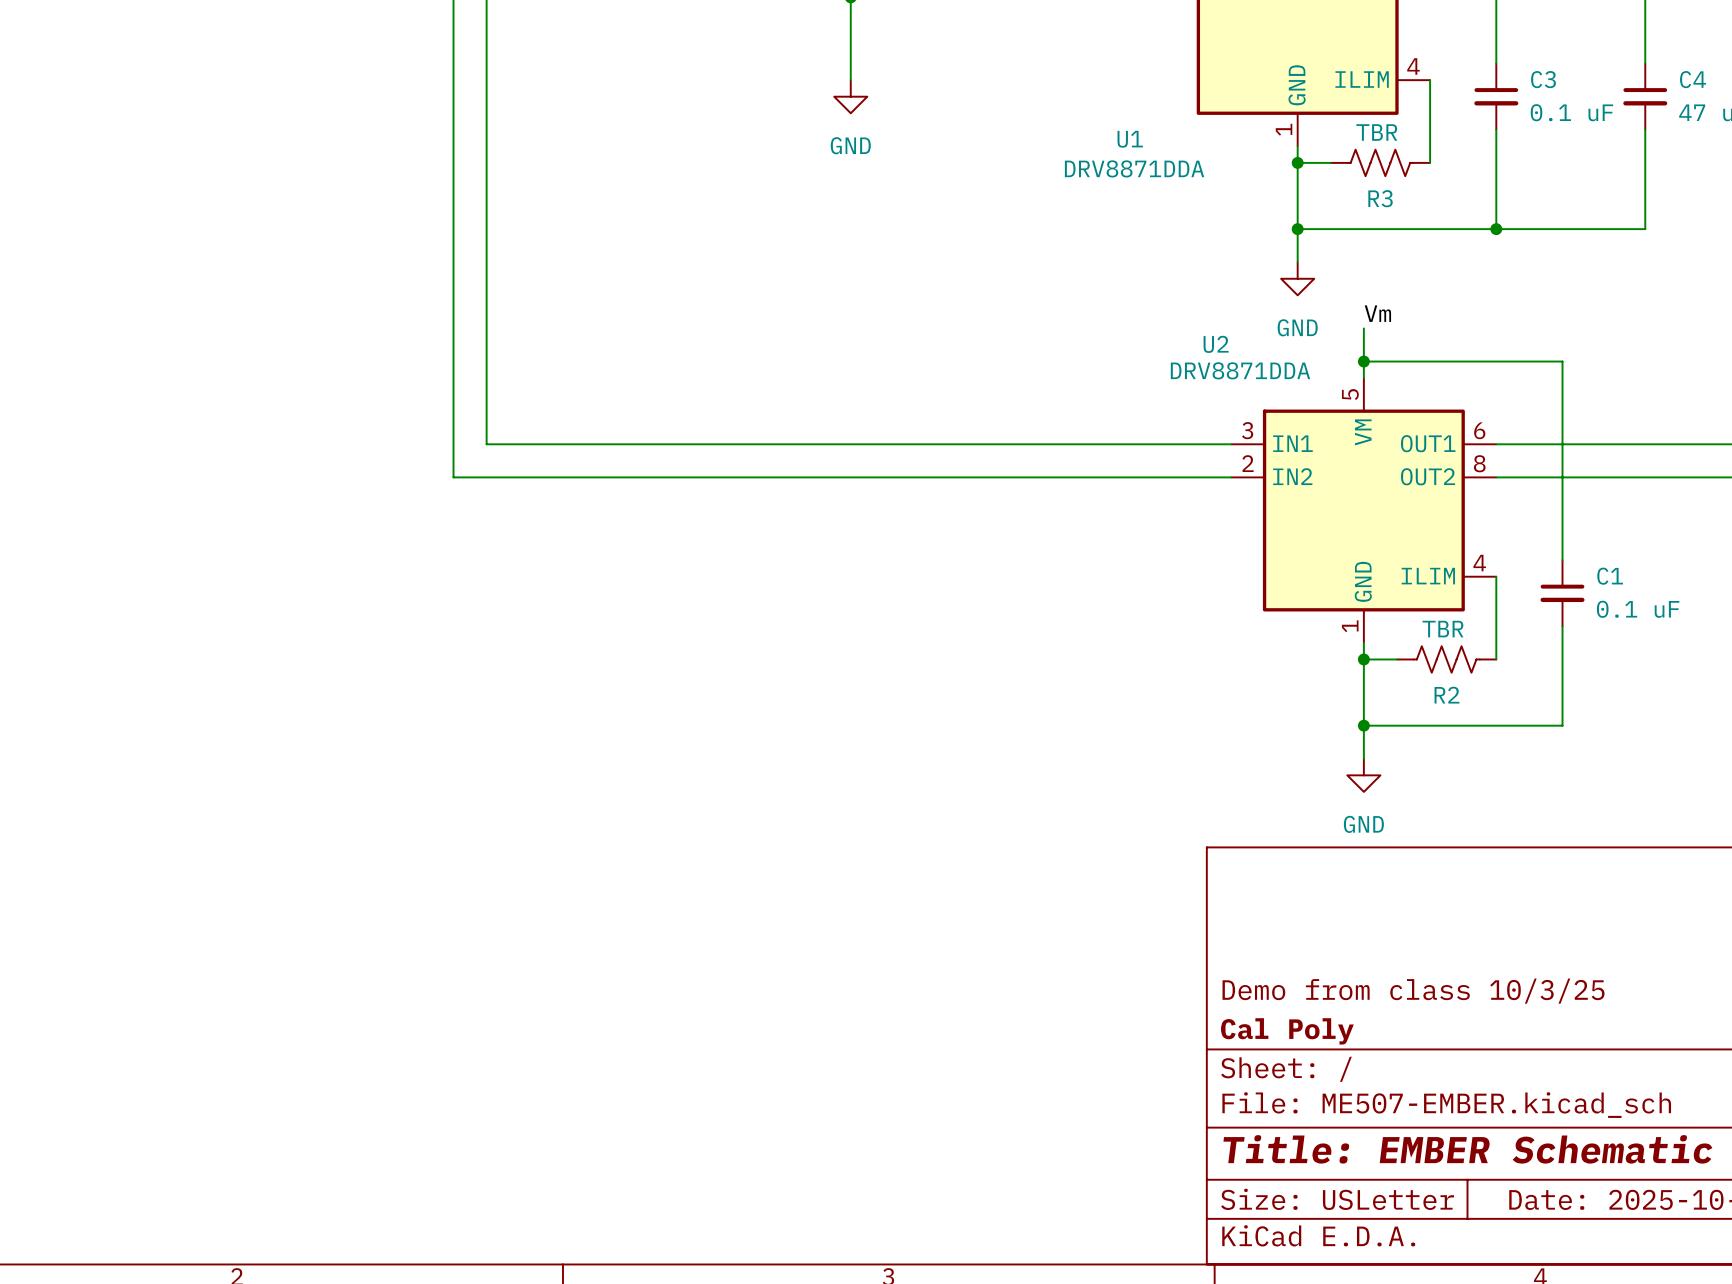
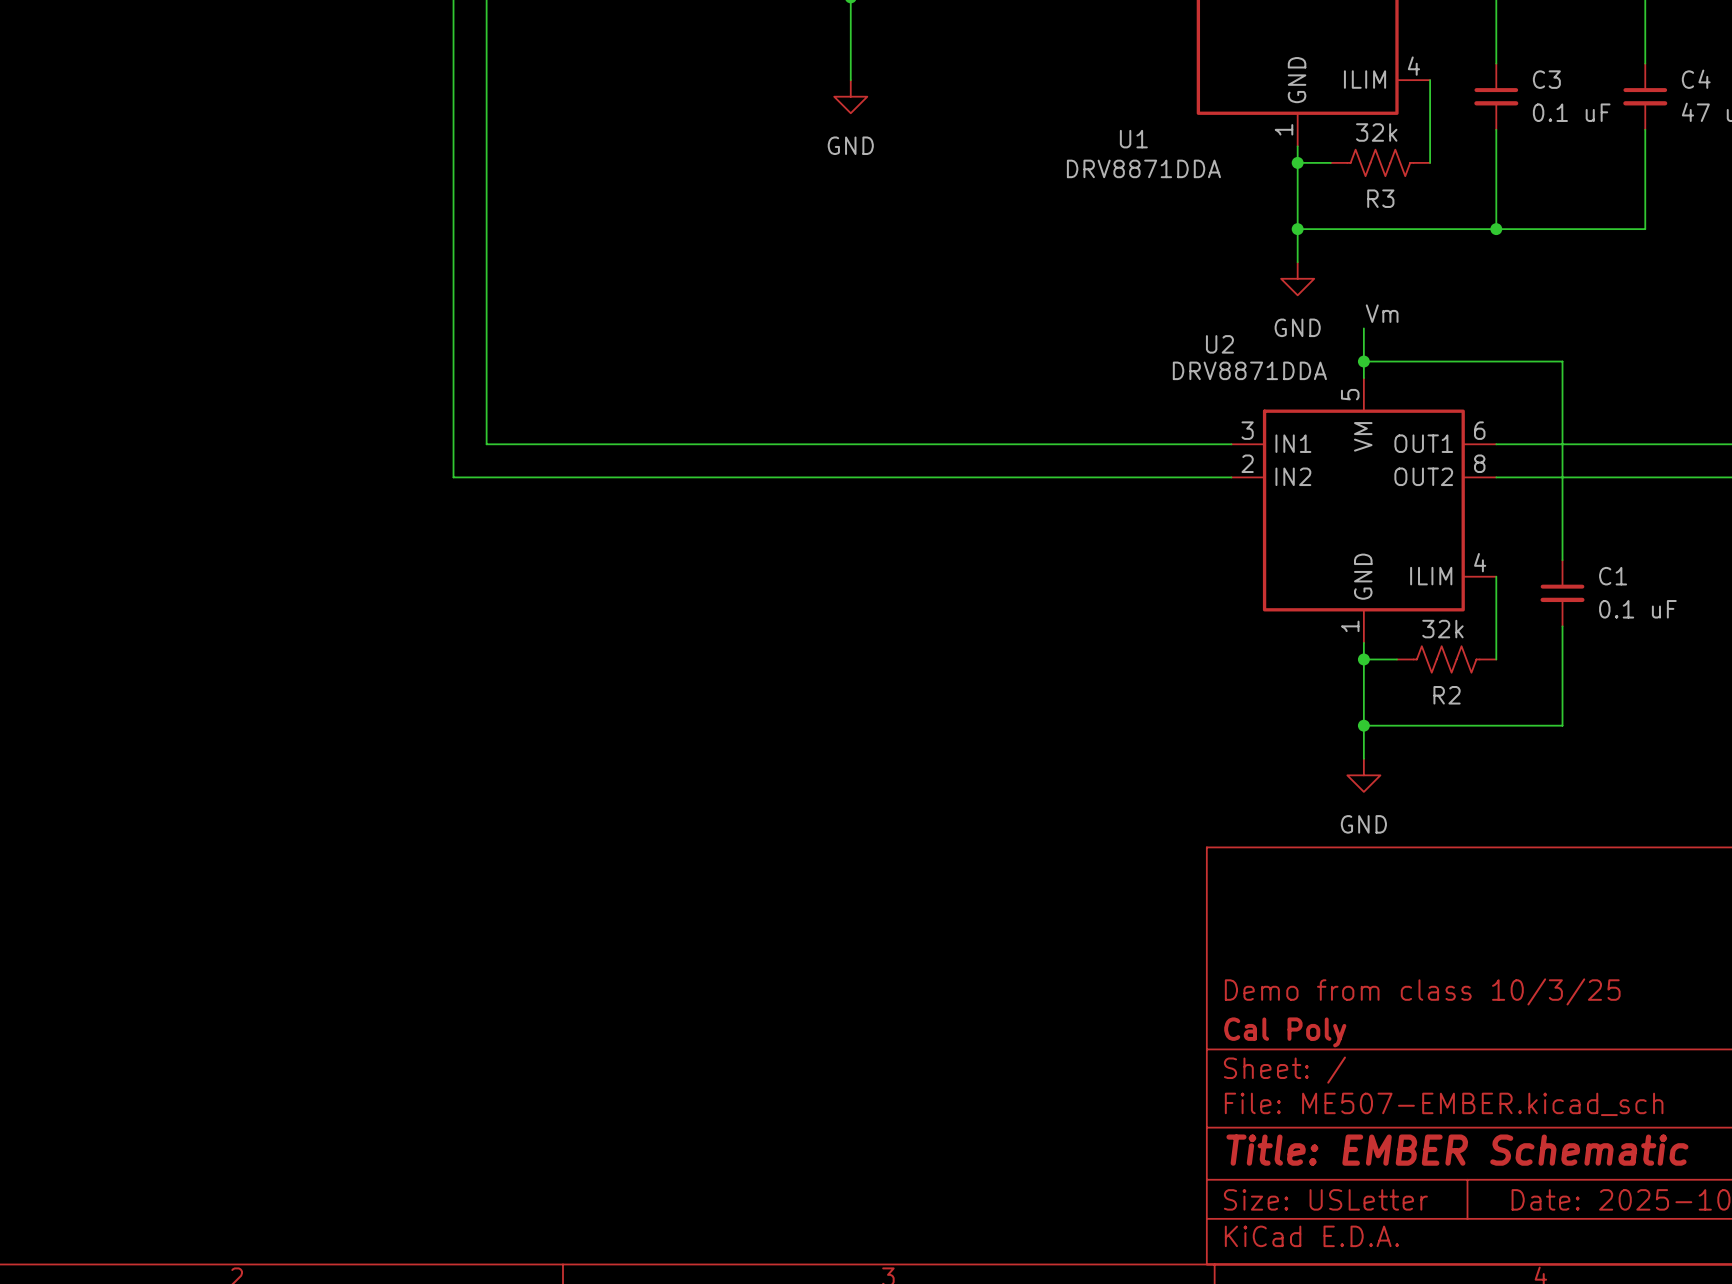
R3 value: TBR (1376, 132) -> 32k (1376, 132)
R2 value: TBR (1443, 629) -> 32k (1442, 629)

